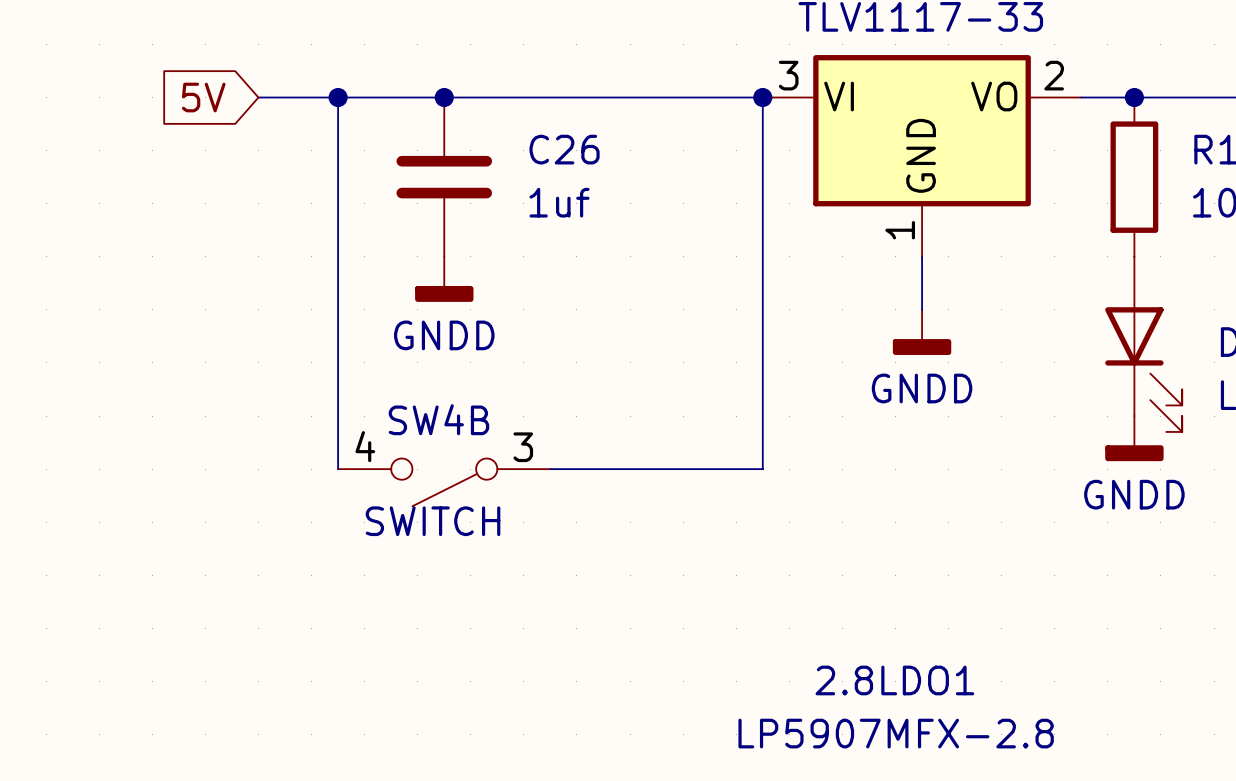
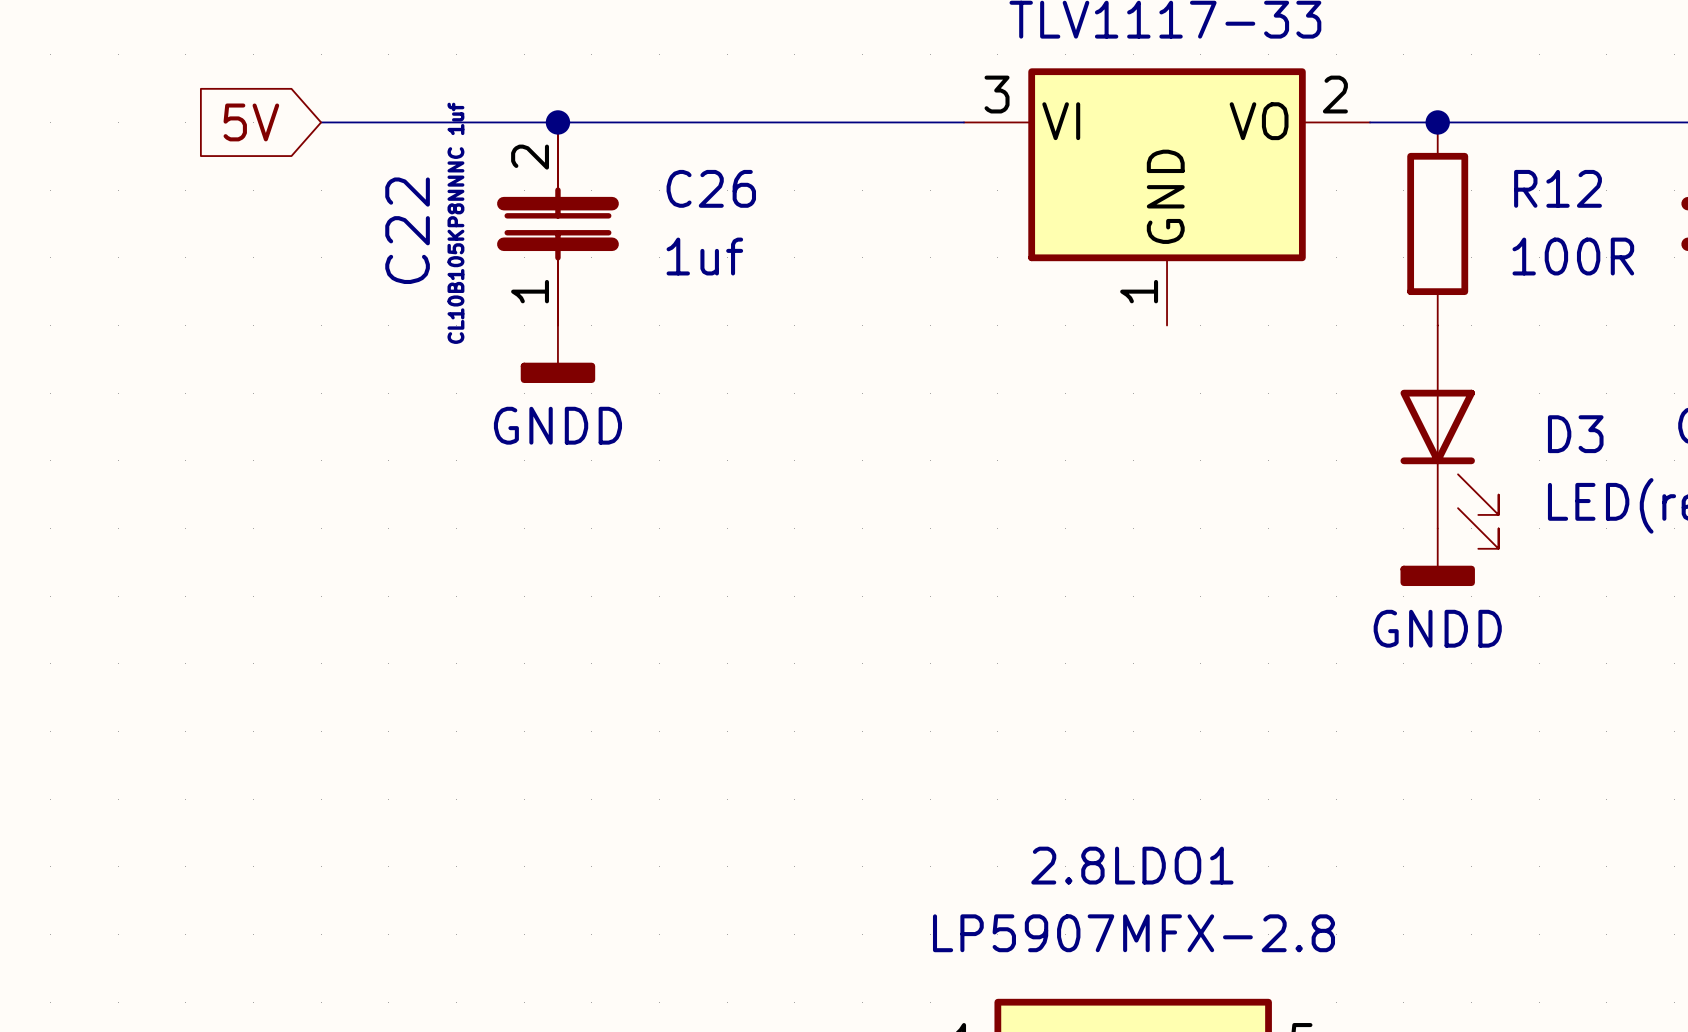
wire: (338, 97) (338, 469) -> none
junction: (338, 97) -> none
wire: (762, 97) (762, 469) (550, 469) -> none
junction: (762, 97) -> none
C22: none -> CL10B105KP8NNNC 1uf (557, 223)
wire: (922, 256) (922, 309) -> none
power symbol: GNDD (922, 332) -> none
SW4B: SWITCH (444, 482) -> none

